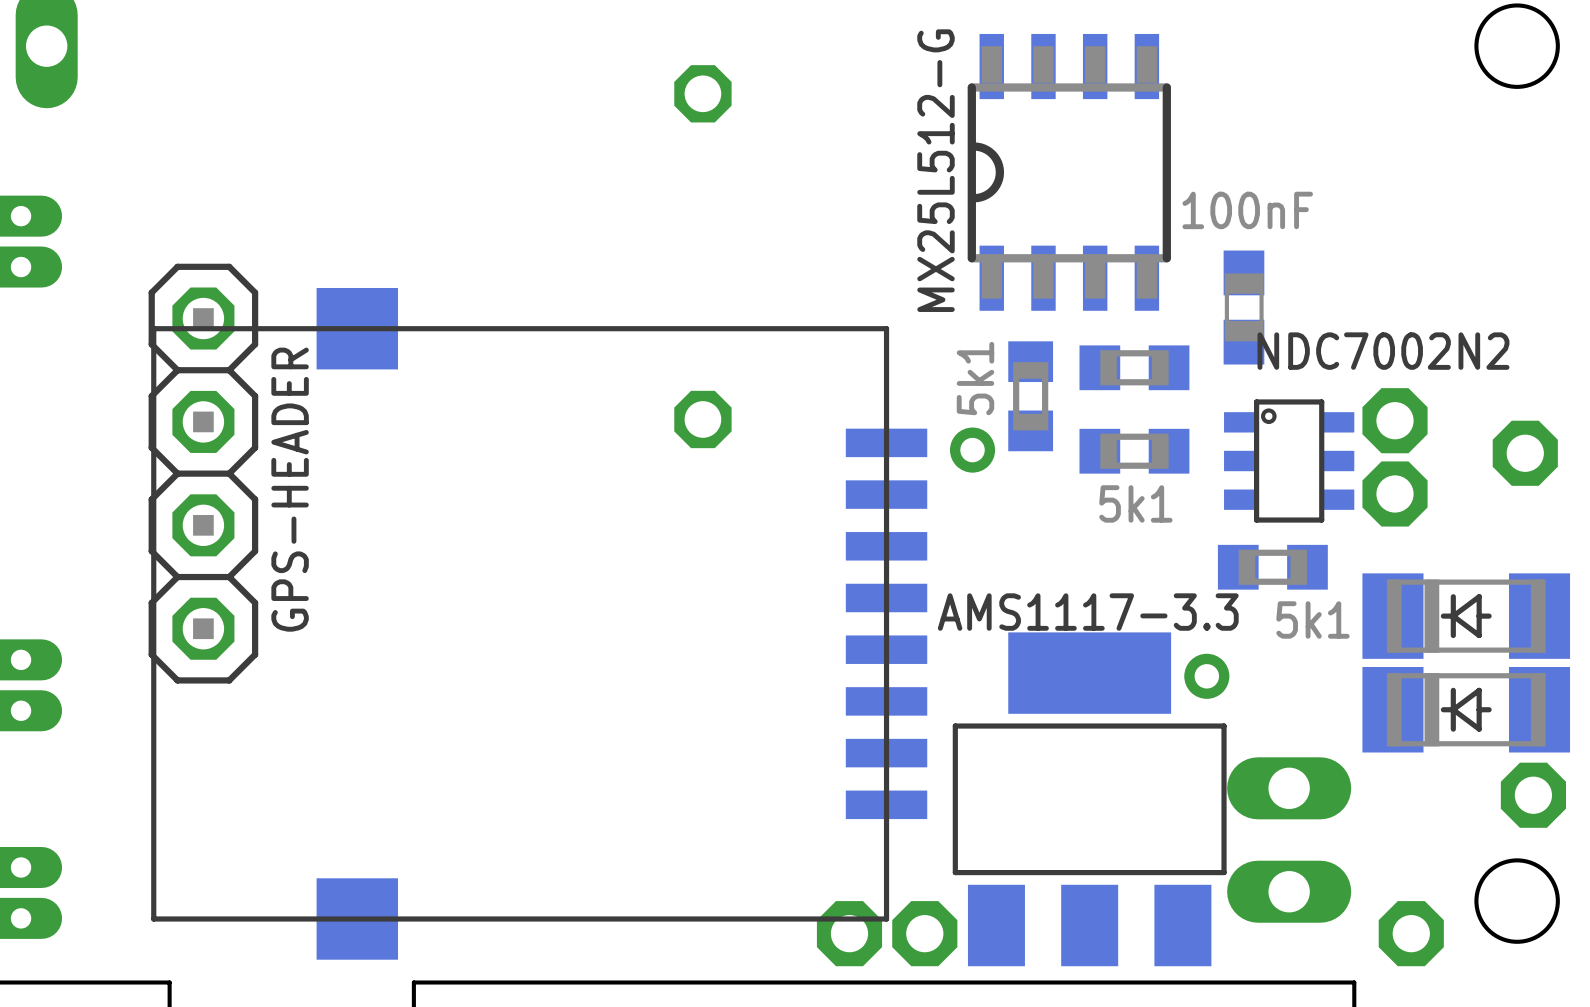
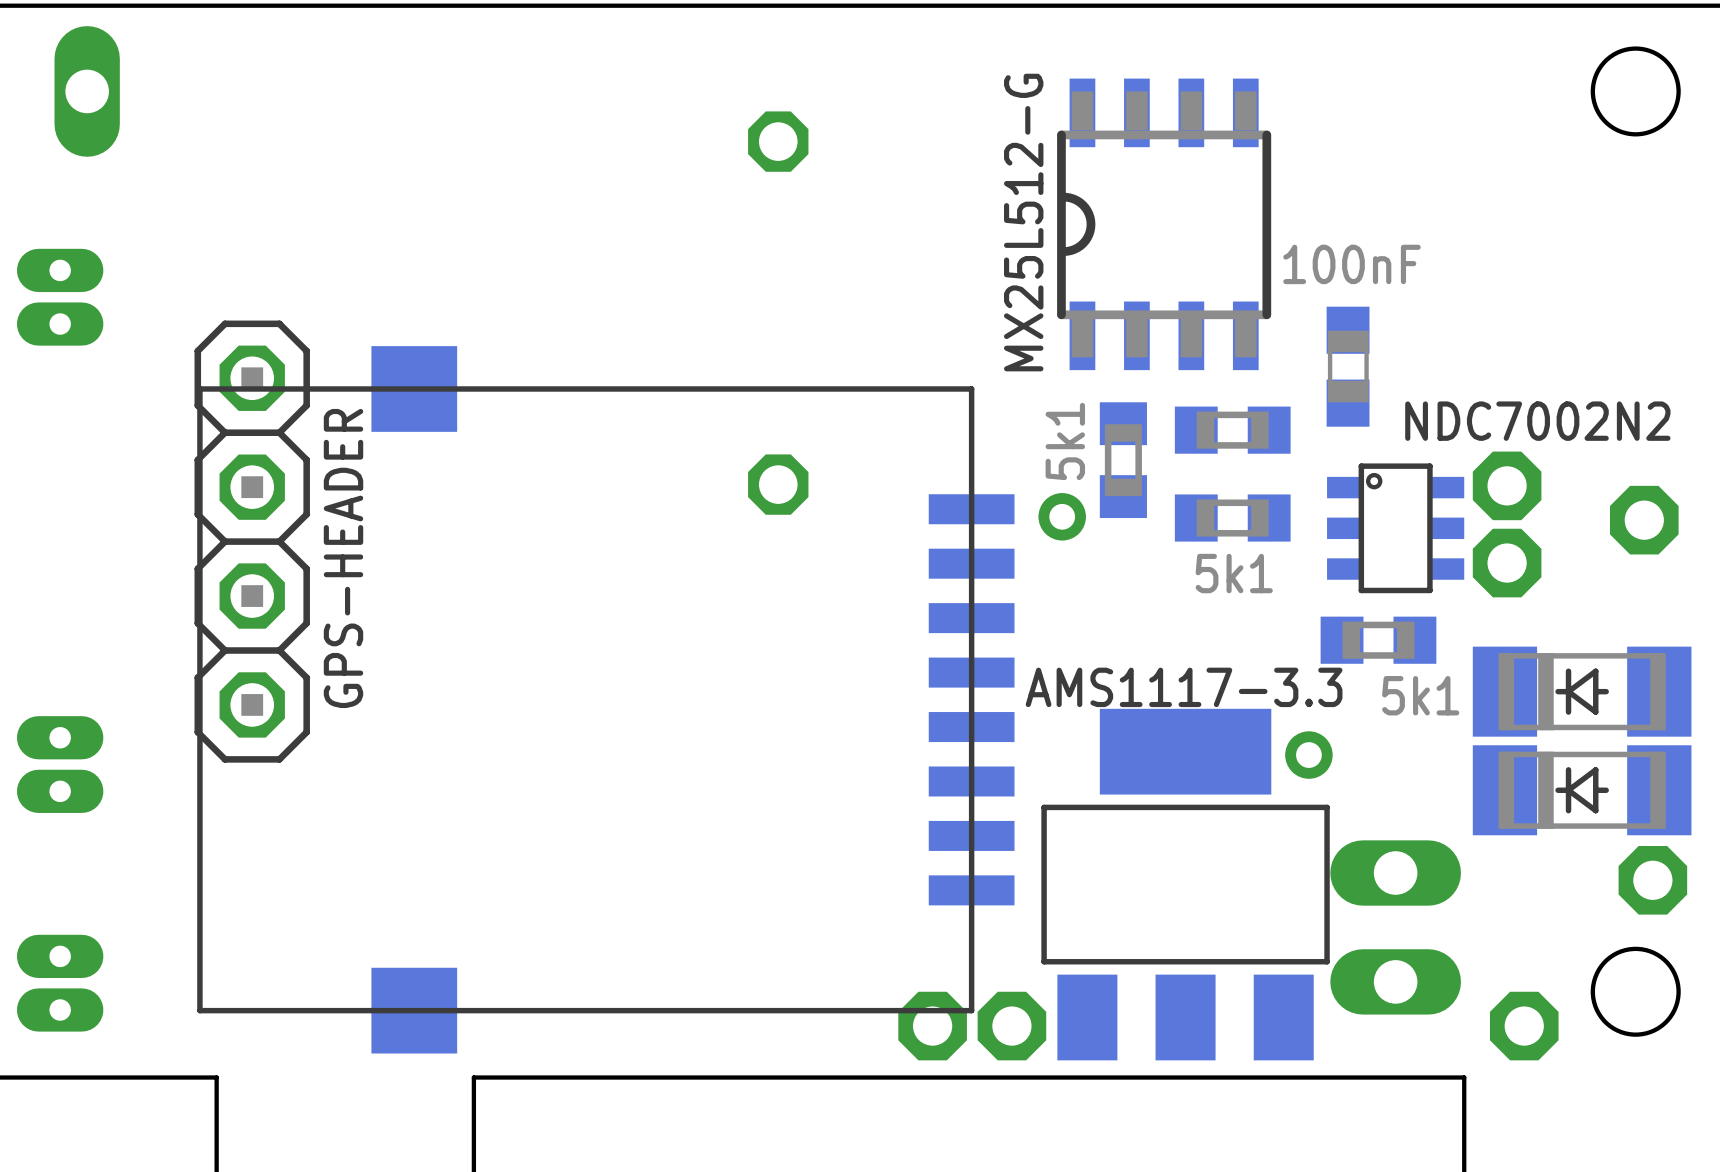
NDC7002N2 name position: NDC7002N2 (1383, 351) -> NDC7002N2 (1537, 421)

